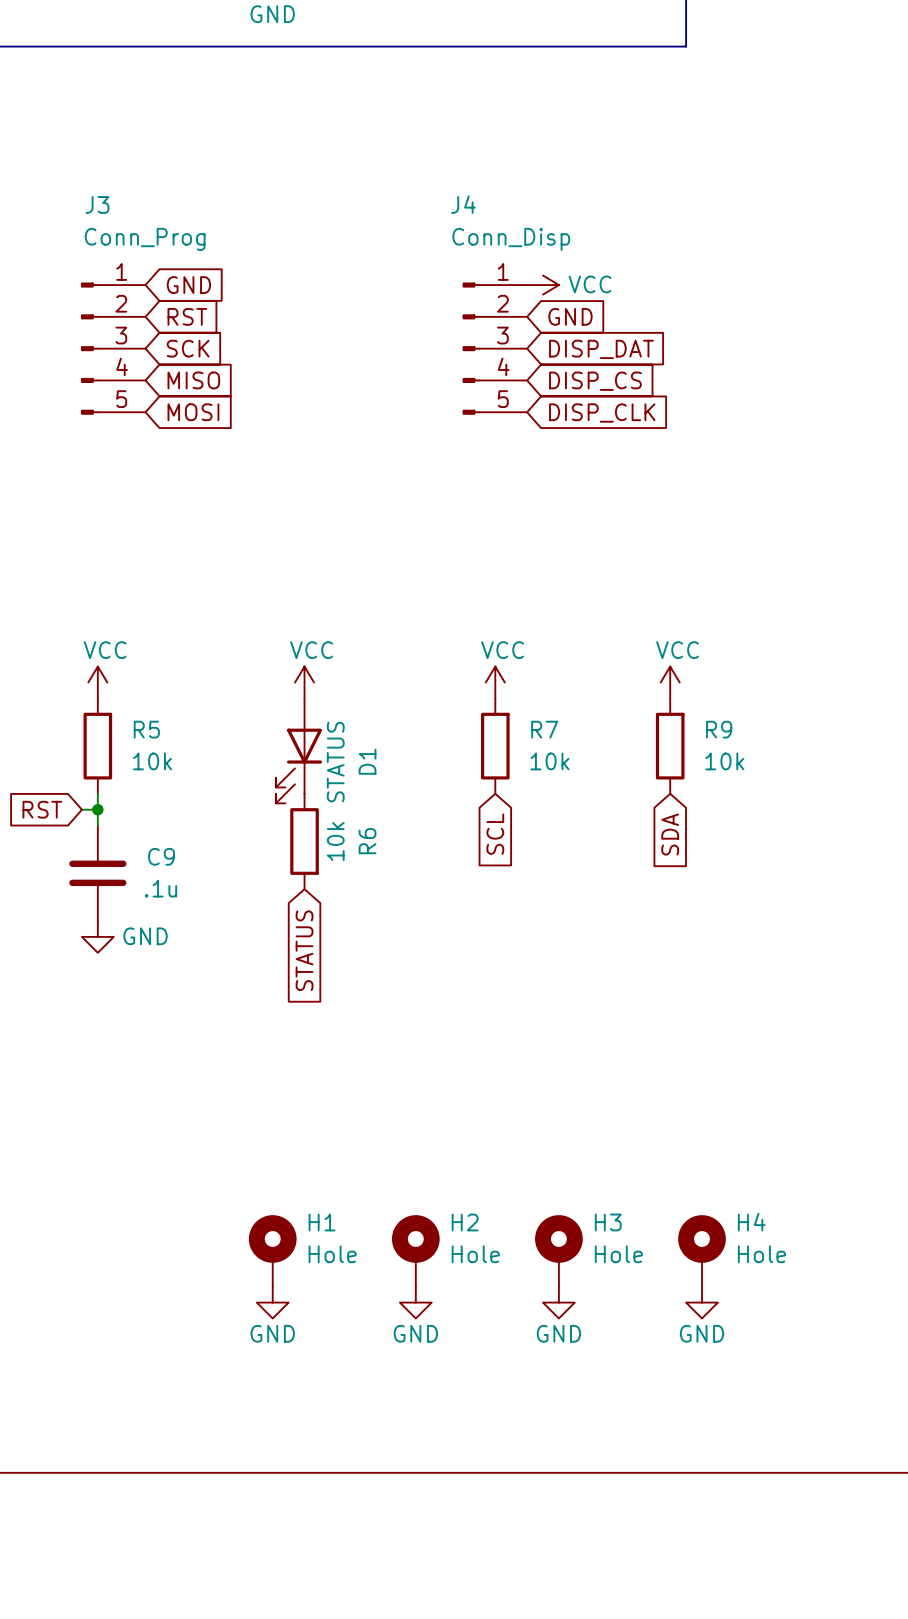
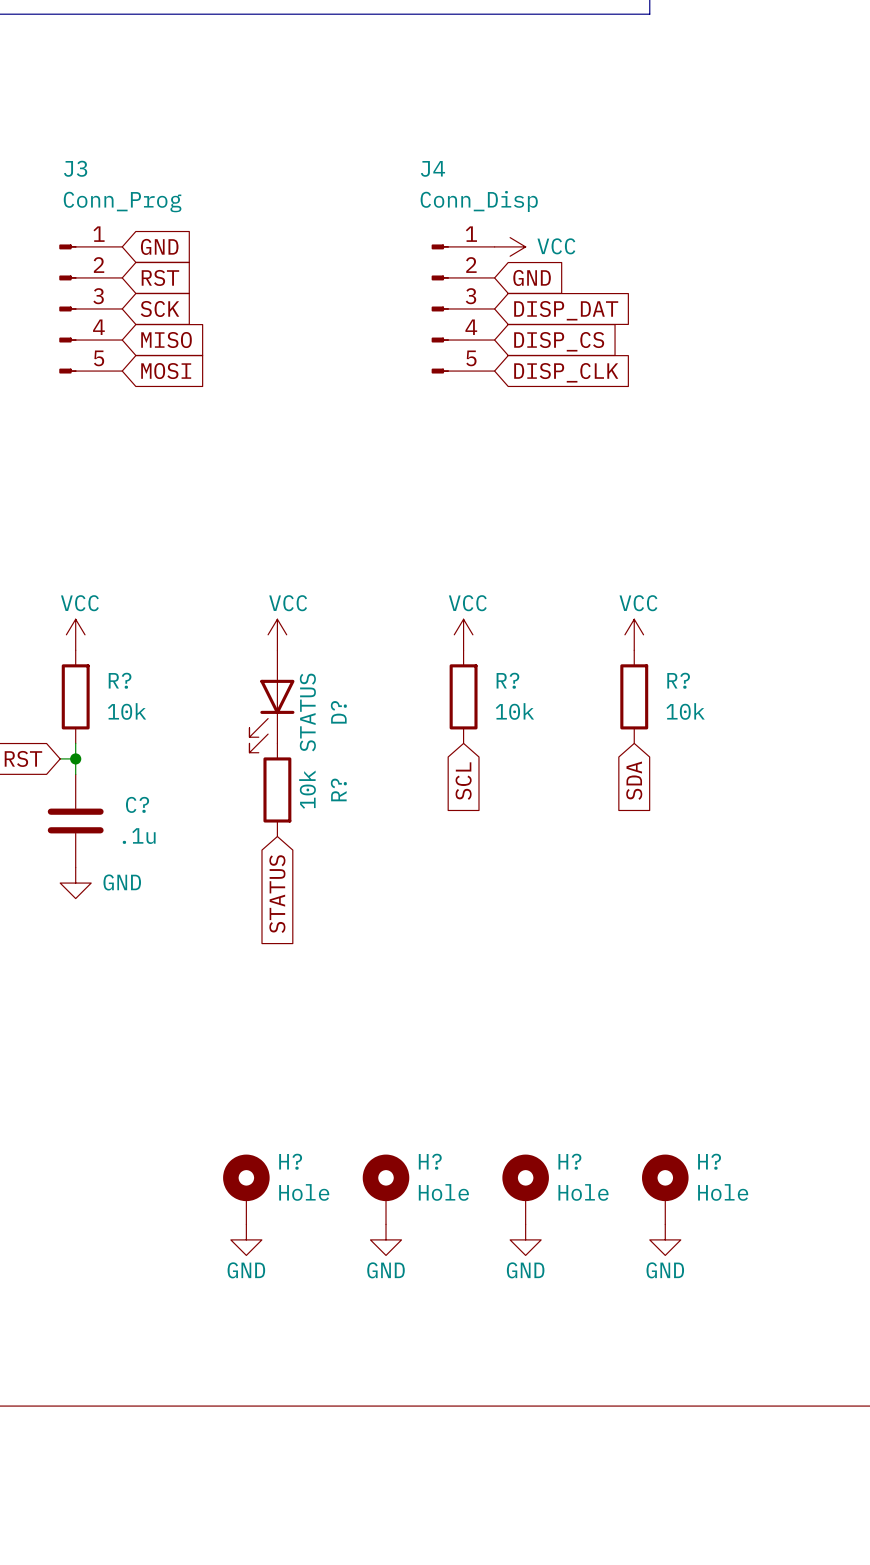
R5 name: R5 (146, 729) -> R? (120, 680)
R7 name: R7 (544, 729) -> R? (507, 680)
R9 name: R9 (719, 729) -> R? (678, 680)
D1 name: D1 (367, 761) -> D? (338, 712)
R6 name: R6 (367, 841) -> R? (338, 789)
C9 name: C9 (161, 856) -> C? (137, 804)
H1 name: H1 (322, 1222) -> H? (290, 1161)
H2 name: H2 (465, 1222) -> H? (430, 1161)
H3 name: H3 (608, 1222) -> H? (569, 1161)
H4 name: H4 (751, 1222) -> H? (709, 1161)

